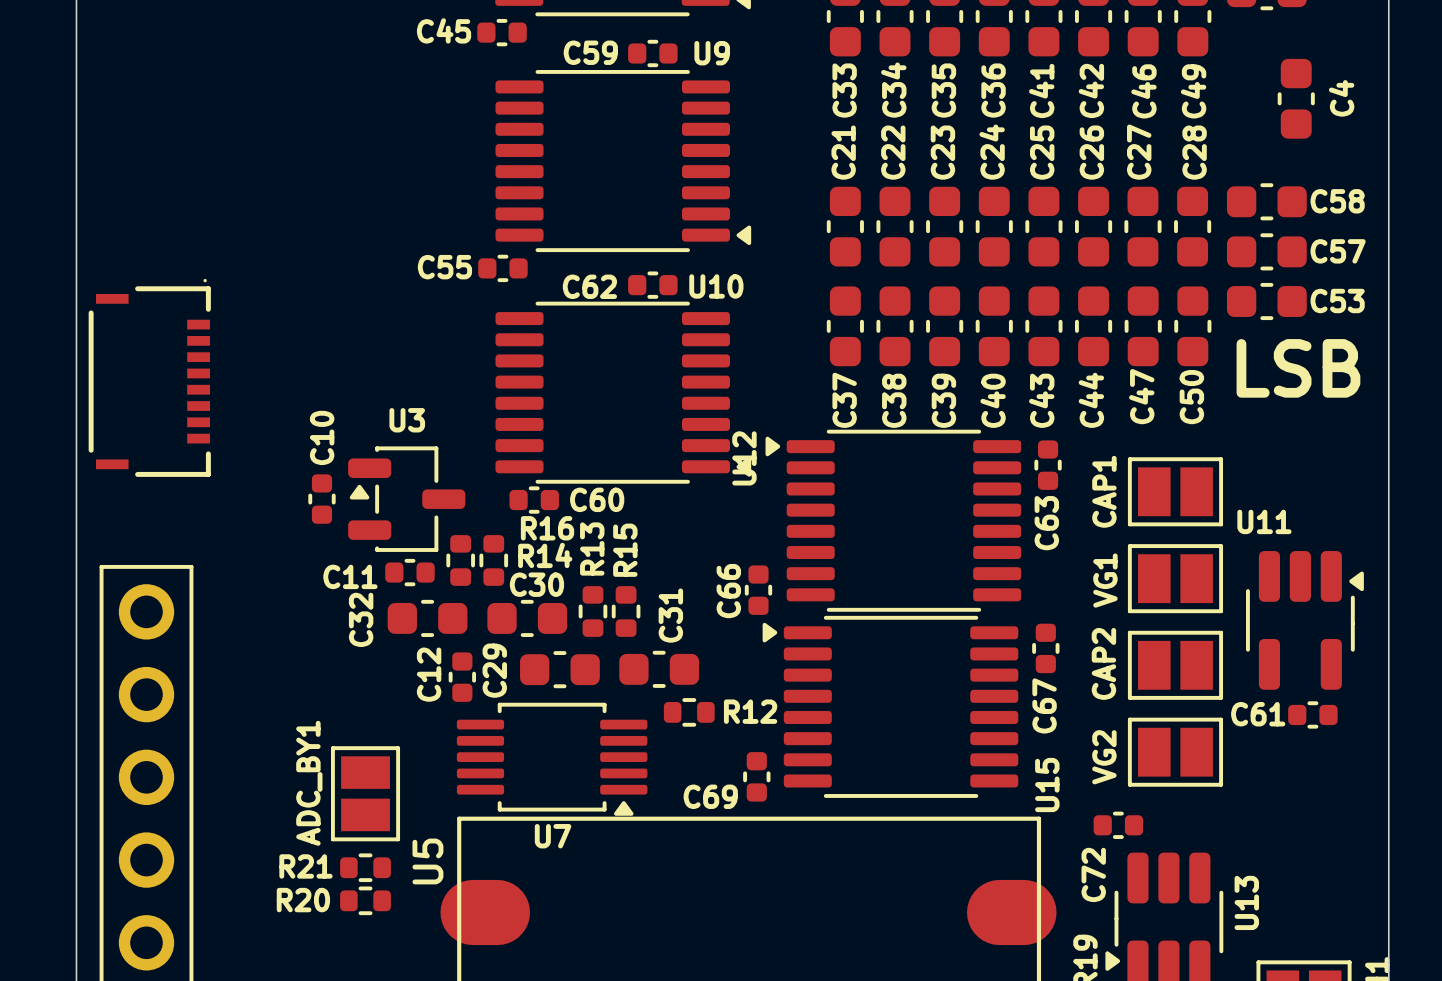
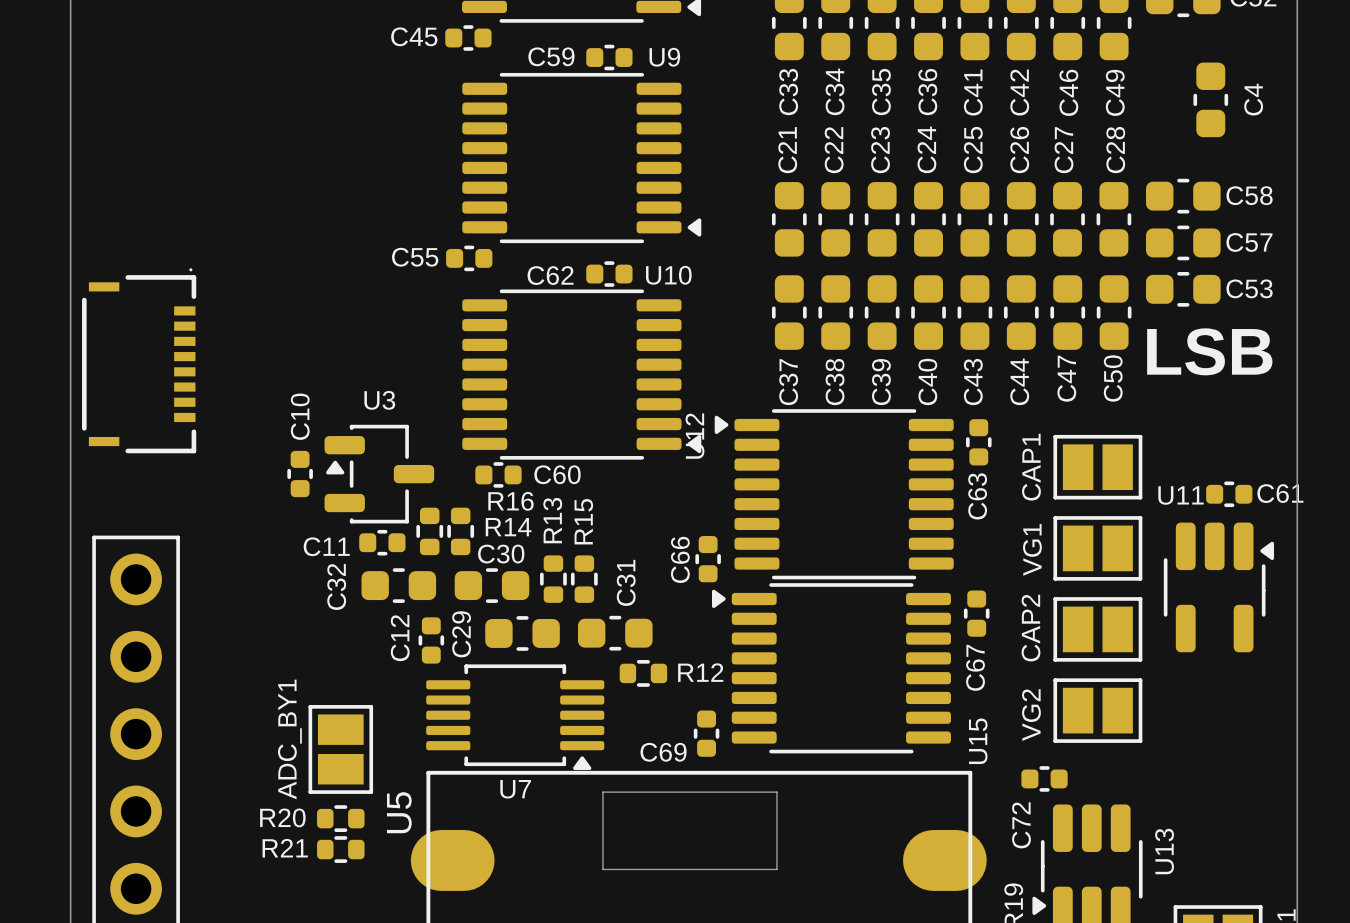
C61 name position: C61 (1258, 714) -> C61 (1280, 493)
C61 position: (1312, 714) -> (1229, 494)
board edge: none -> (602, 792) (602, 869) (776, 869) (776, 792) (602, 792)
R21 name: R21 (305, 866) -> R20 (282, 817)
R20 name: R20 (303, 900) -> R21 (285, 848)

